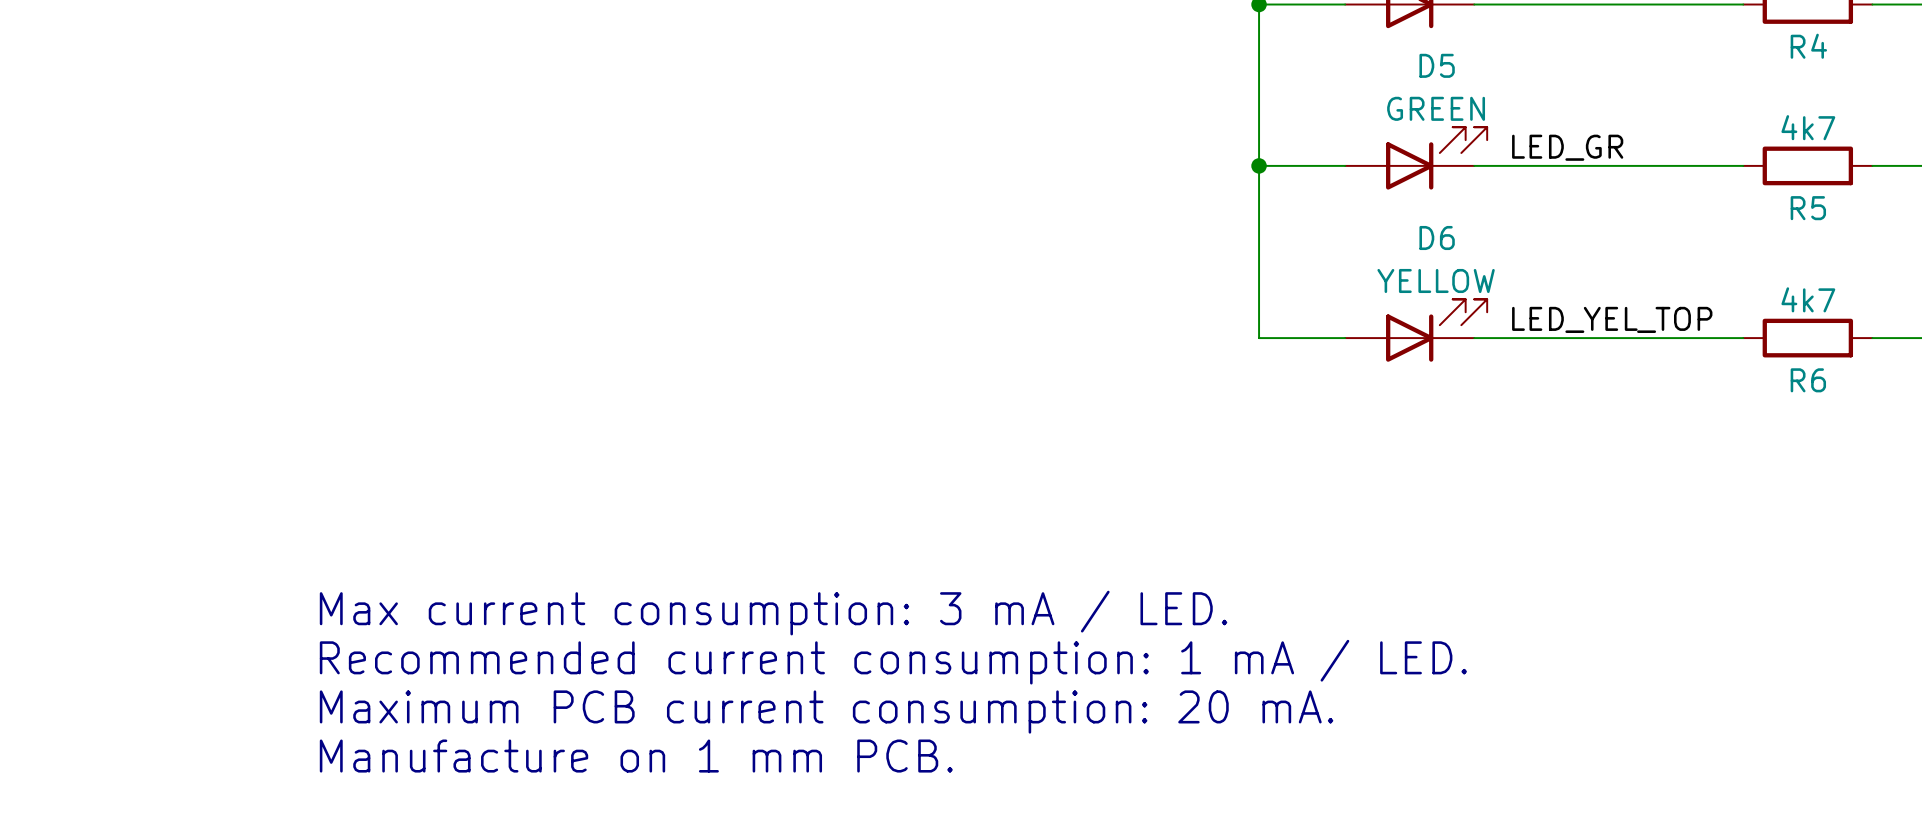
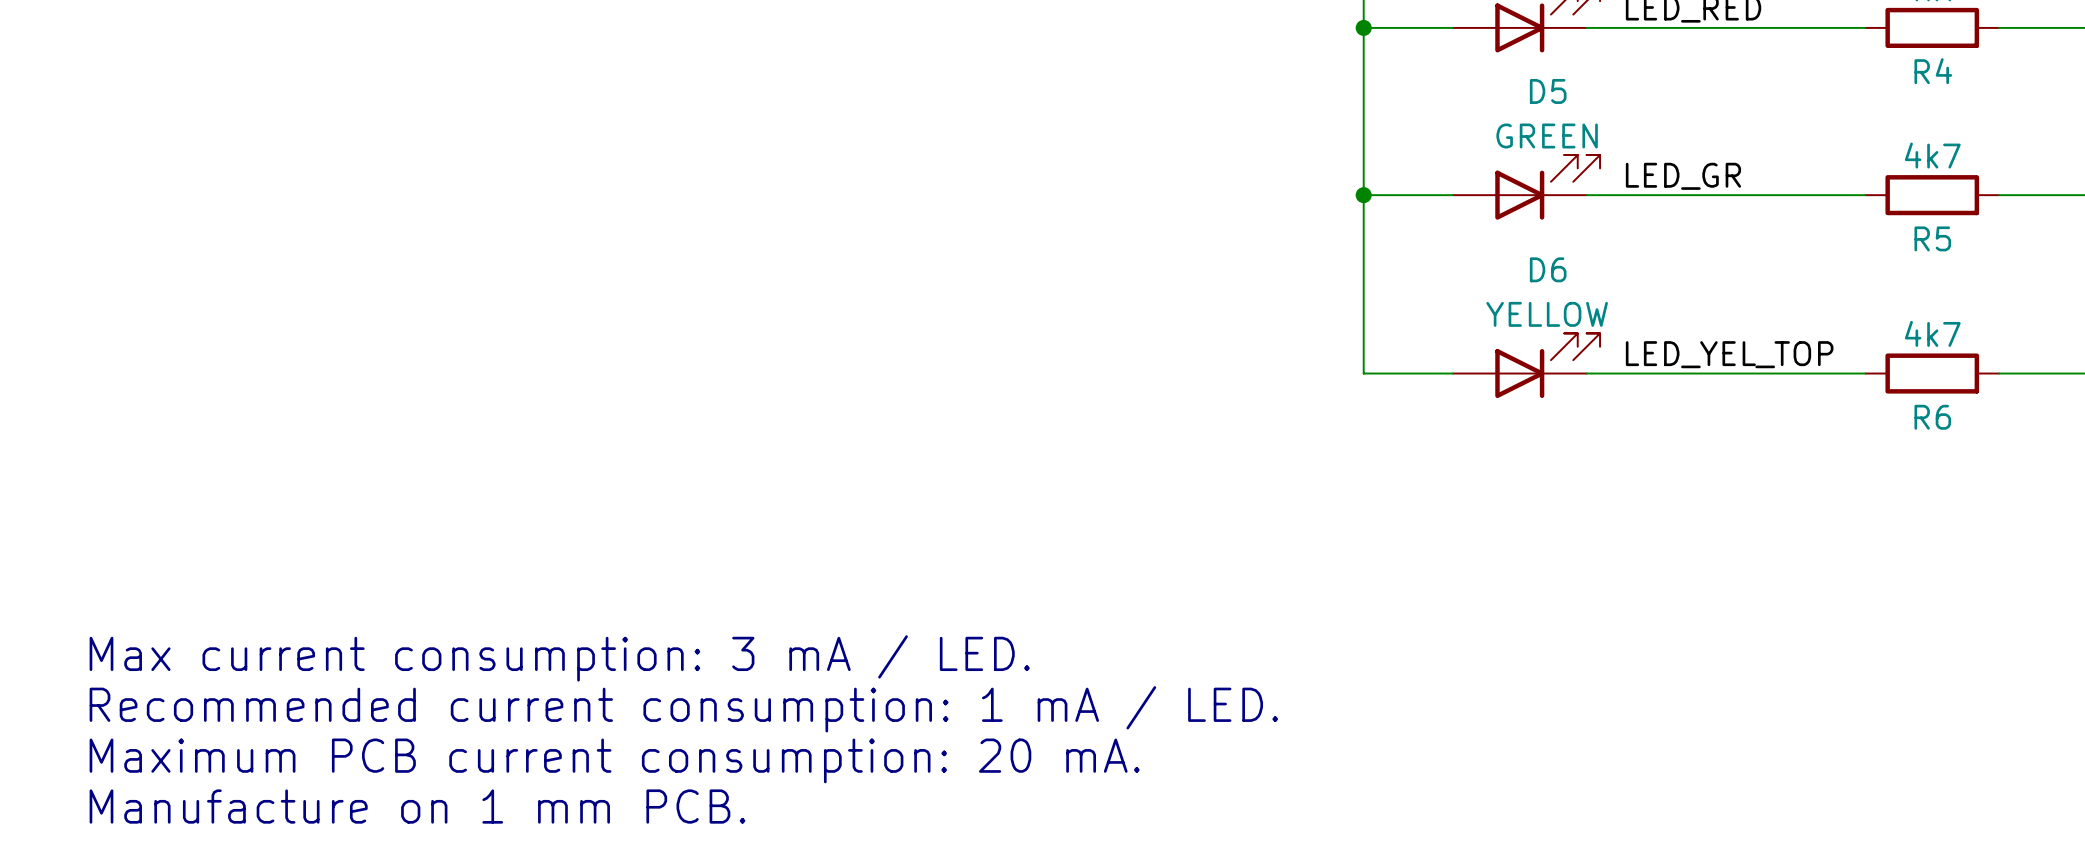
text position: Max current consumption: 3 mA / LED. (773, 613) -> Max current consumption: 3 mA / LED. (559, 658)
text position: Recommended current consumption: 1 mA / LED. (893, 662) -> Recommended current consumption: 1 mA / LED. (683, 709)
text position: Maximum PCB current consumption: 20 mA. (826, 712) -> Maximum PCB current consumption: 20 mA. (614, 760)
text position: Manufacture on 1 mm PCB. (636, 756) -> Manufacture on 1 mm PCB. (417, 806)

